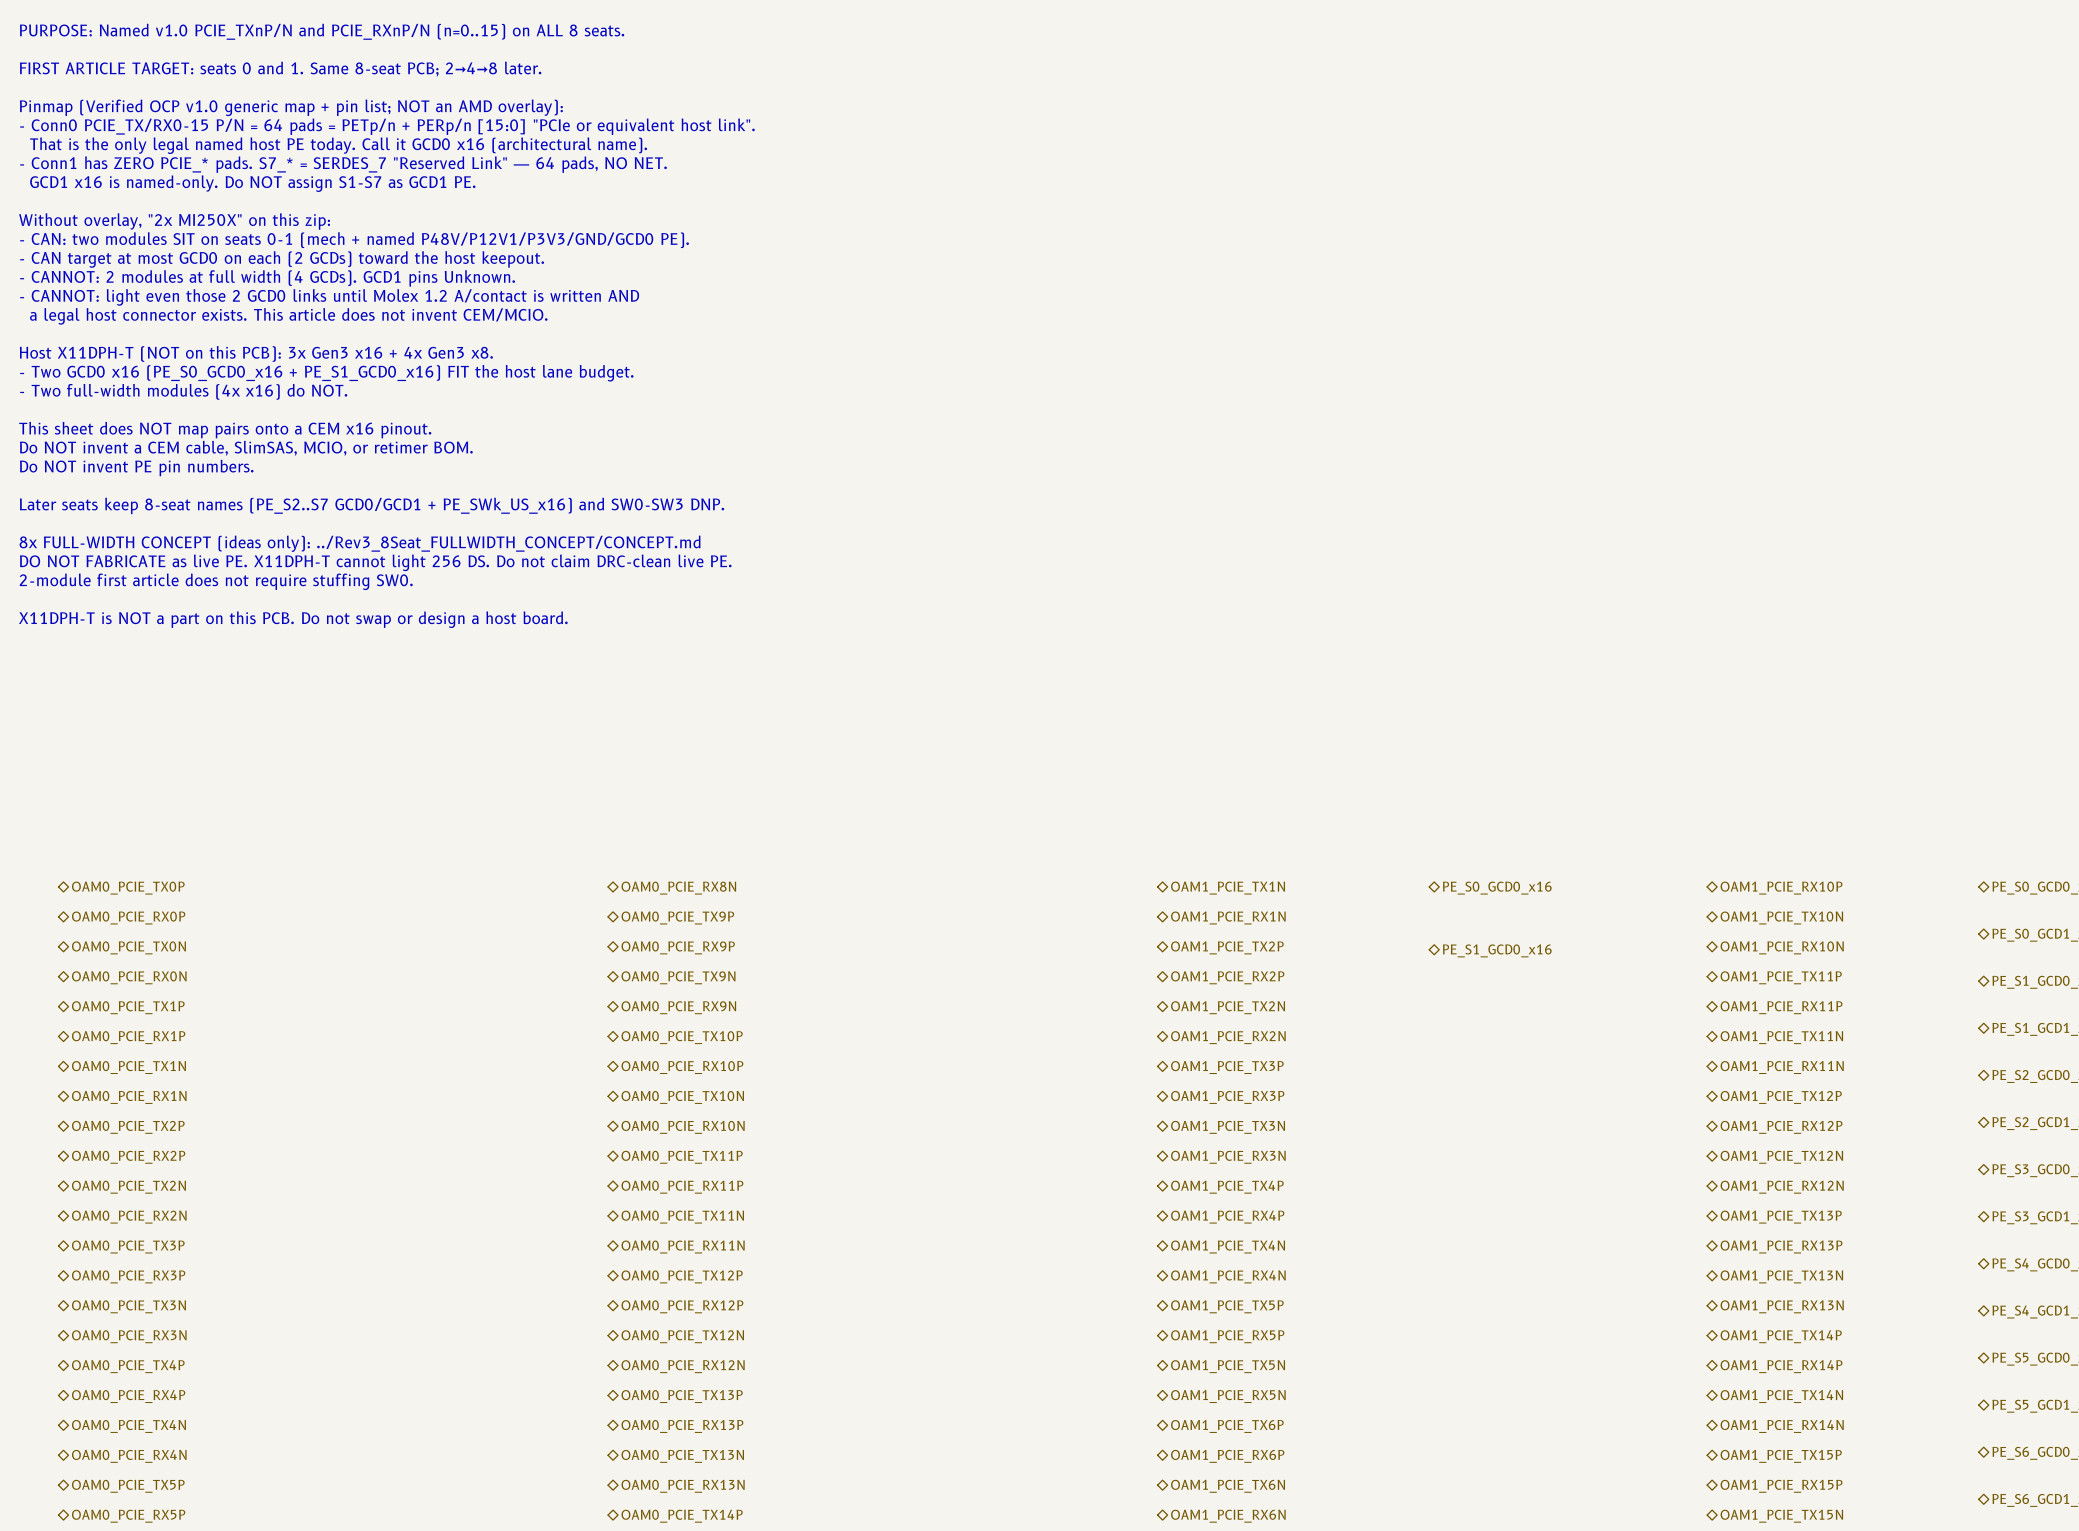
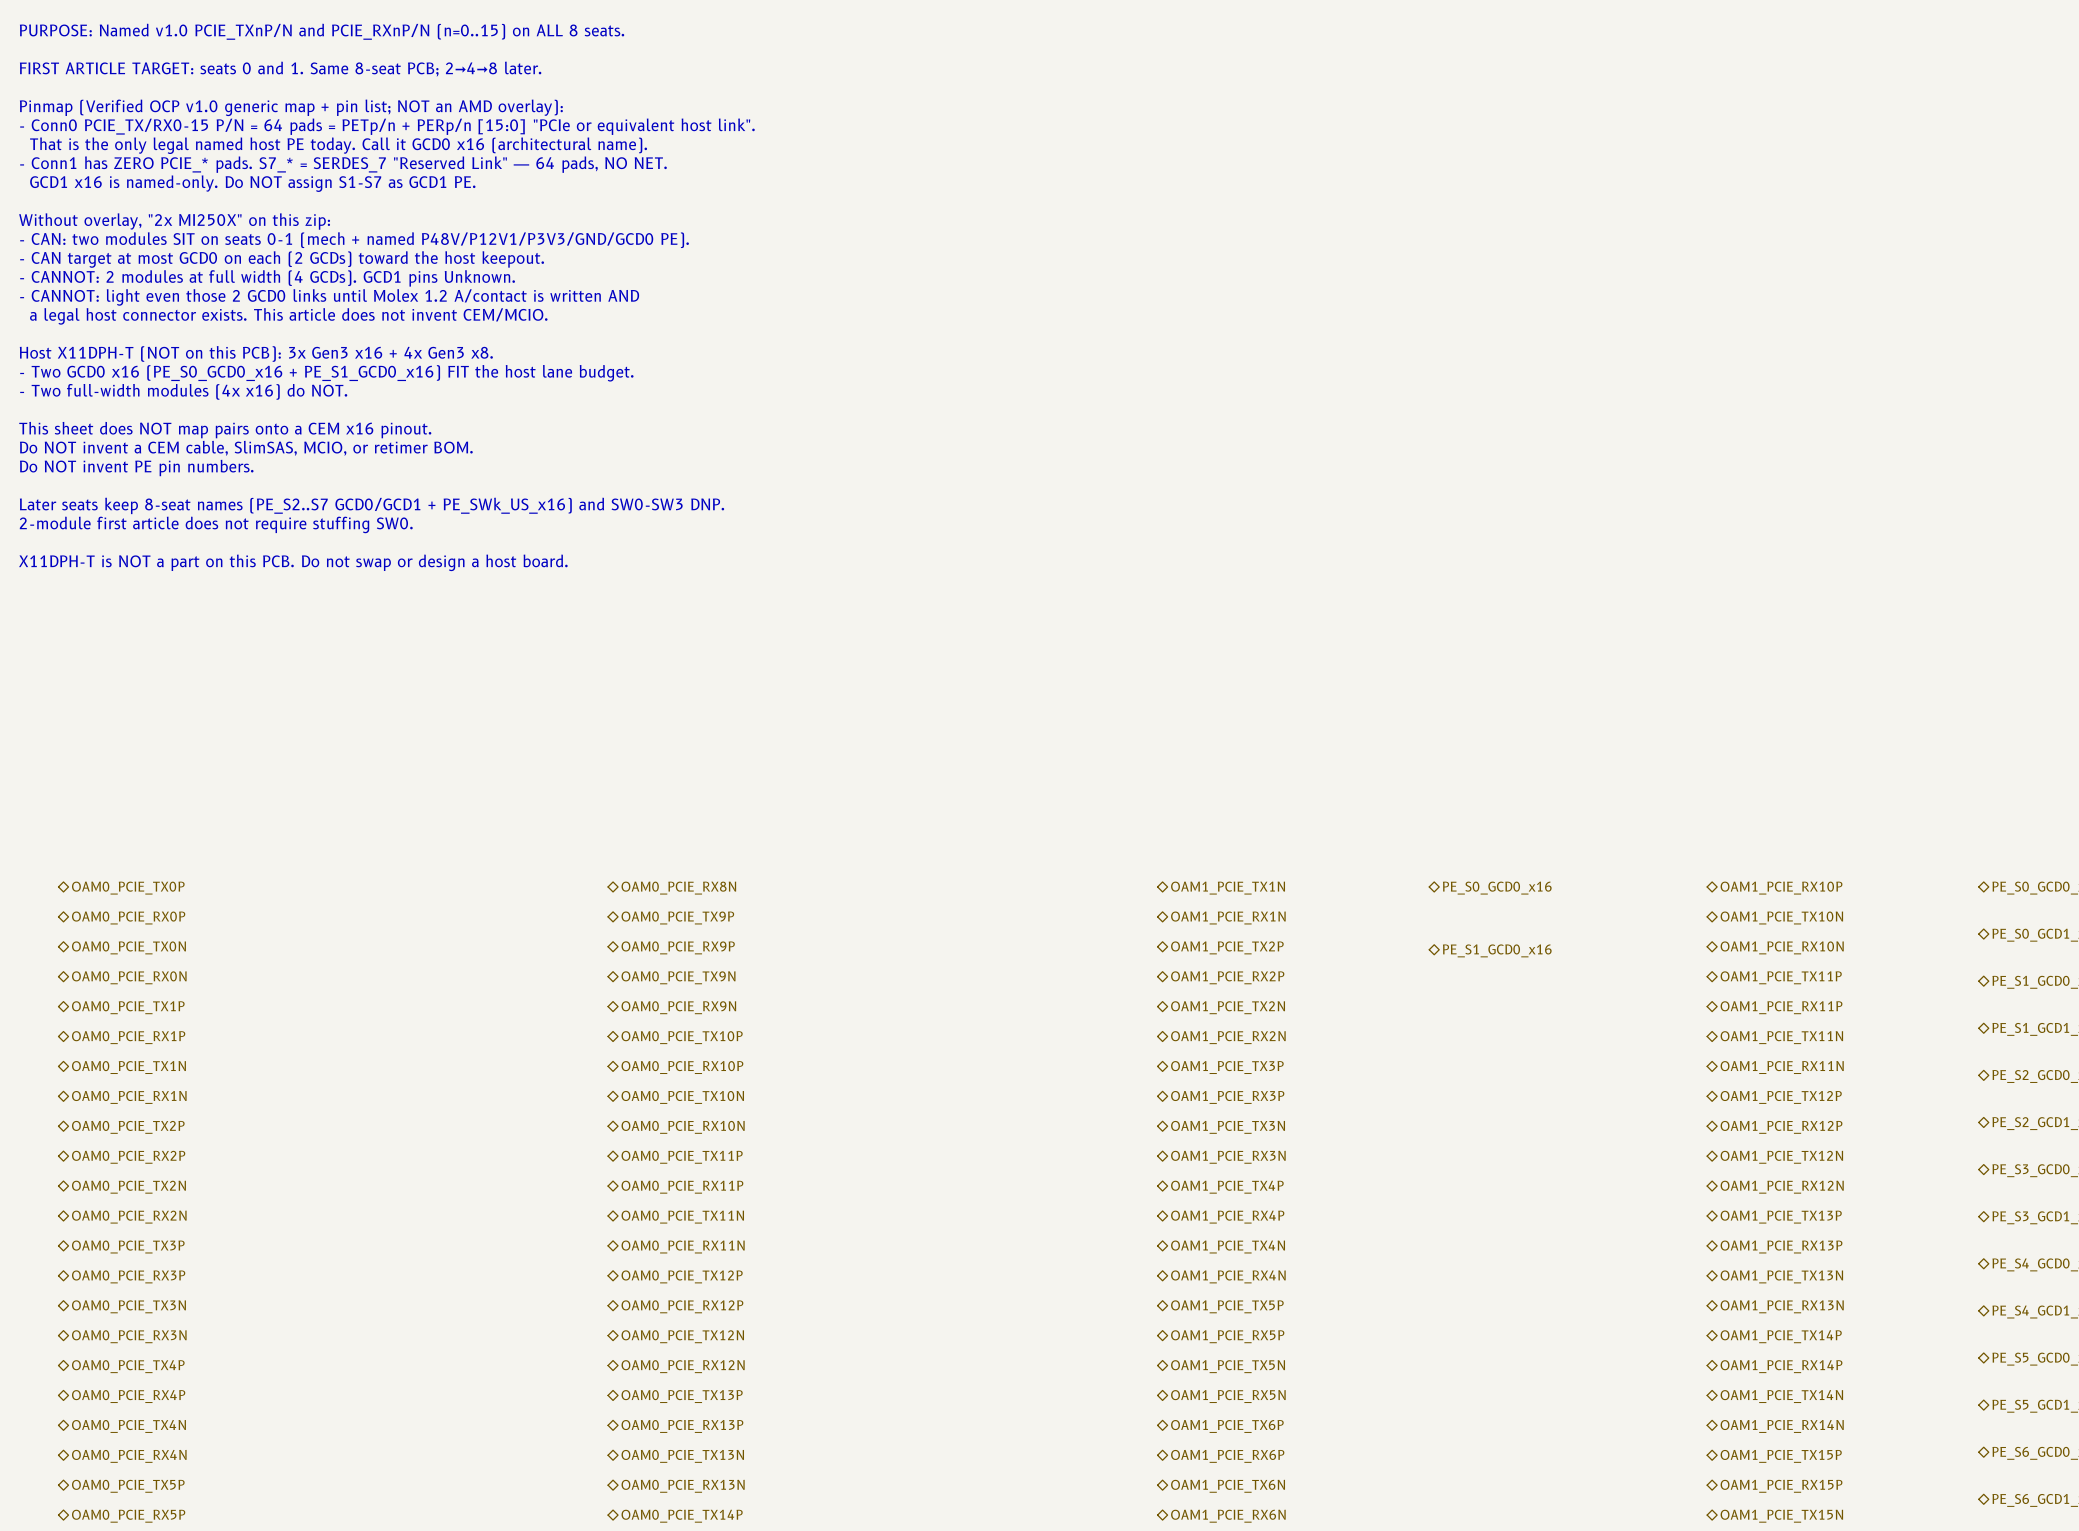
text: 8x FULL-WIDTH CONCEPT (ideas only): ../Rev3_8Seat_FULLWIDTH_CONCEPT/CONCEPT.md (360, 543) -> none
text: DO NOT FABRICATE as live PE. X11DPH-T cannot light 256 DS. Do not claim DRC-clean live PE. (375, 562) -> X11DPH-T is NOT a part on this PCB. Do not swap or design a host board. (293, 562)
text position: 2-module first article does not require stuffing SW0. (216, 581) -> 2-module first article does not require stuffing SW0. (216, 524)
text: X11DPH-T is NOT a part on this PCB. Do not swap or design a host board. (293, 619) -> none

